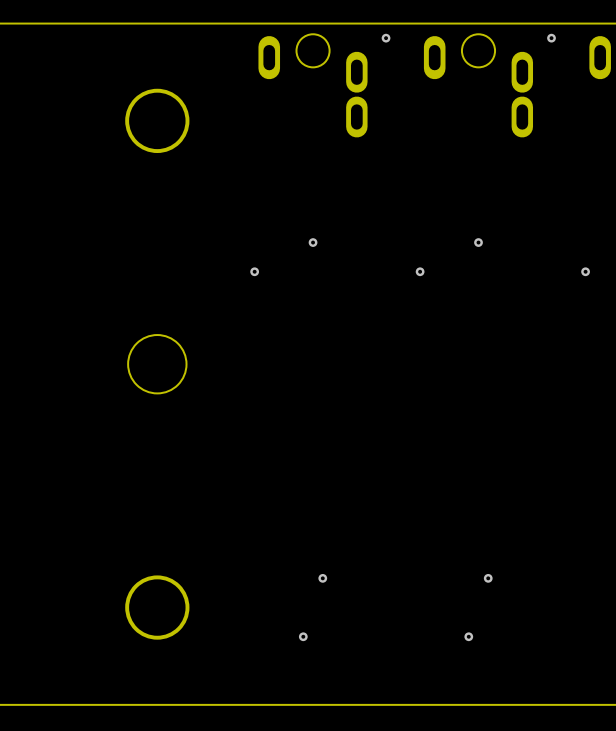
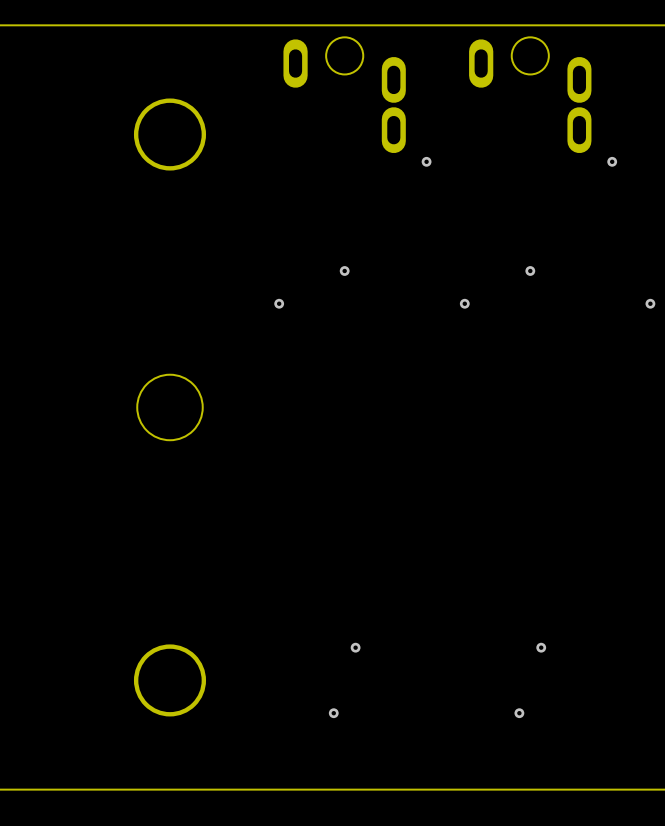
via: (386, 38) -> none
via: (551, 38) -> none
via: none -> (426, 161)
via: none -> (612, 161)

